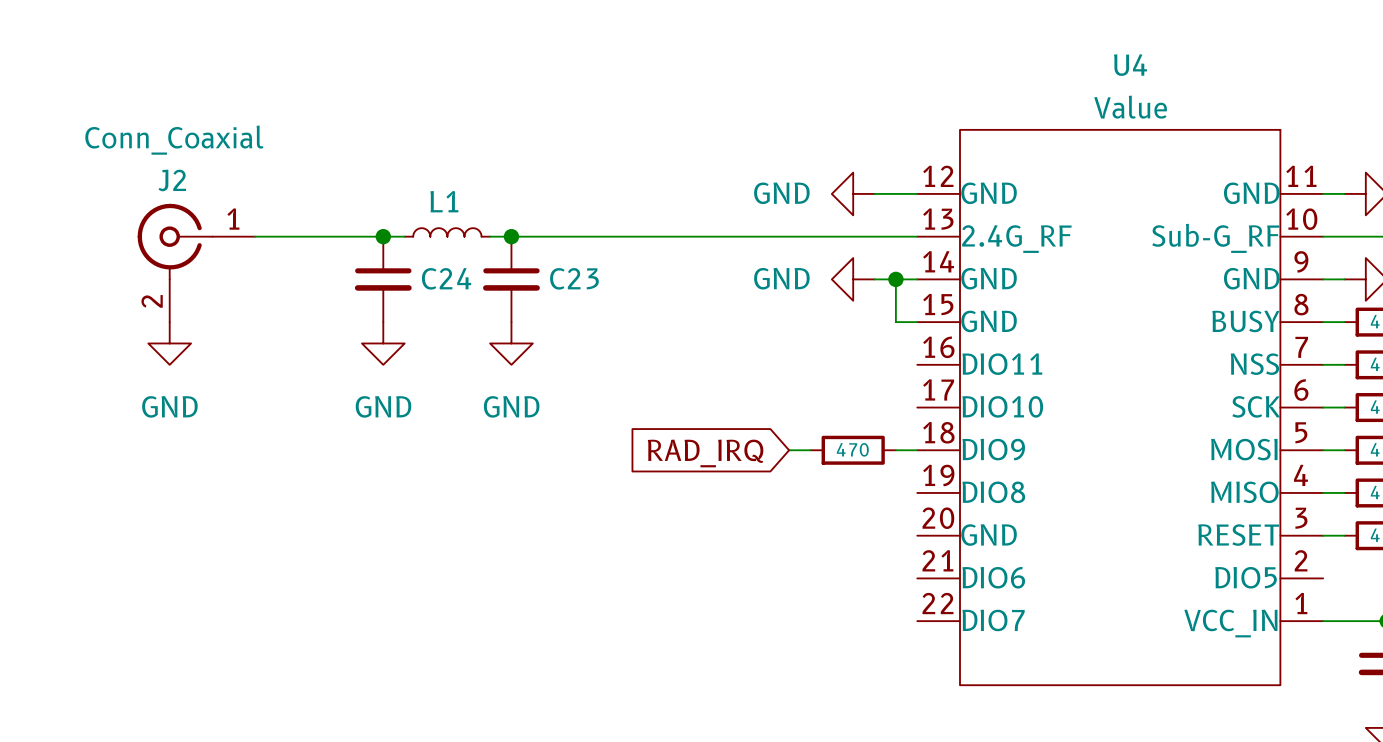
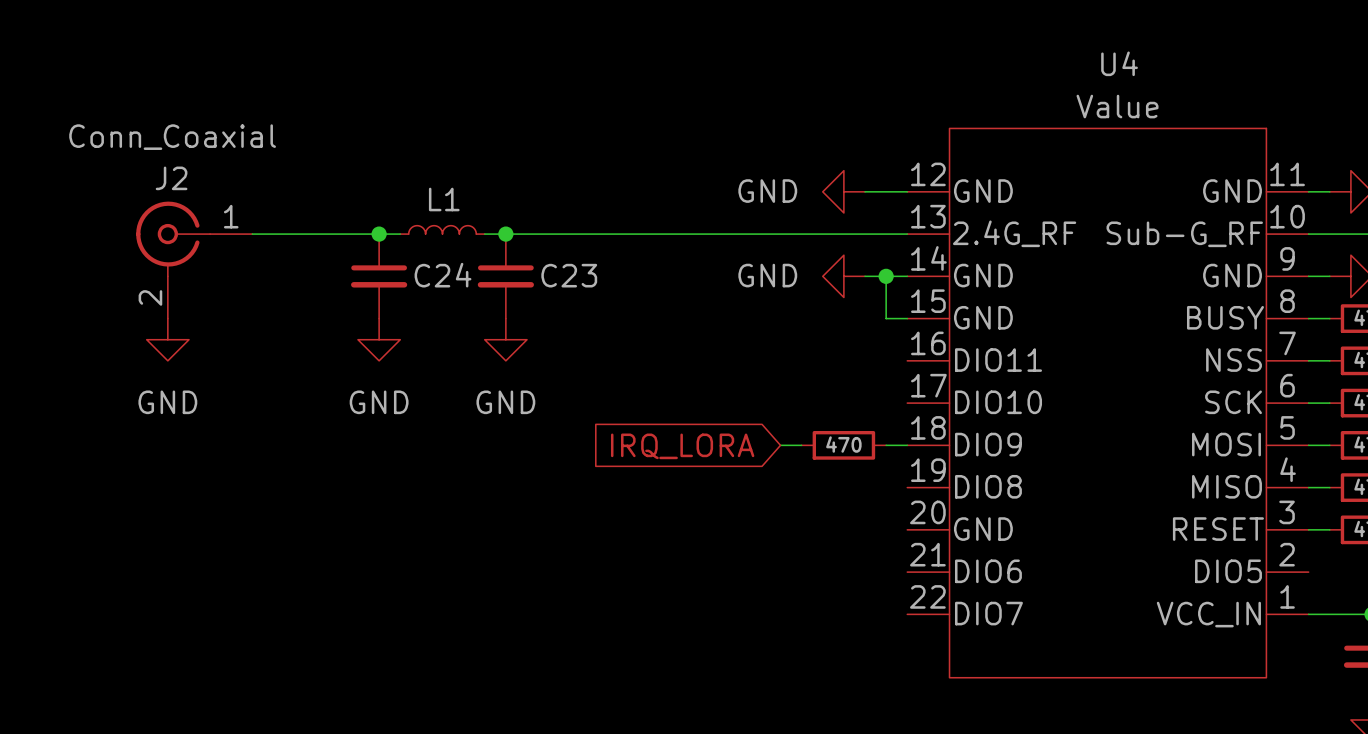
global label: RAD_IRQ (705, 453) -> IRQ_LORA (682, 446)

